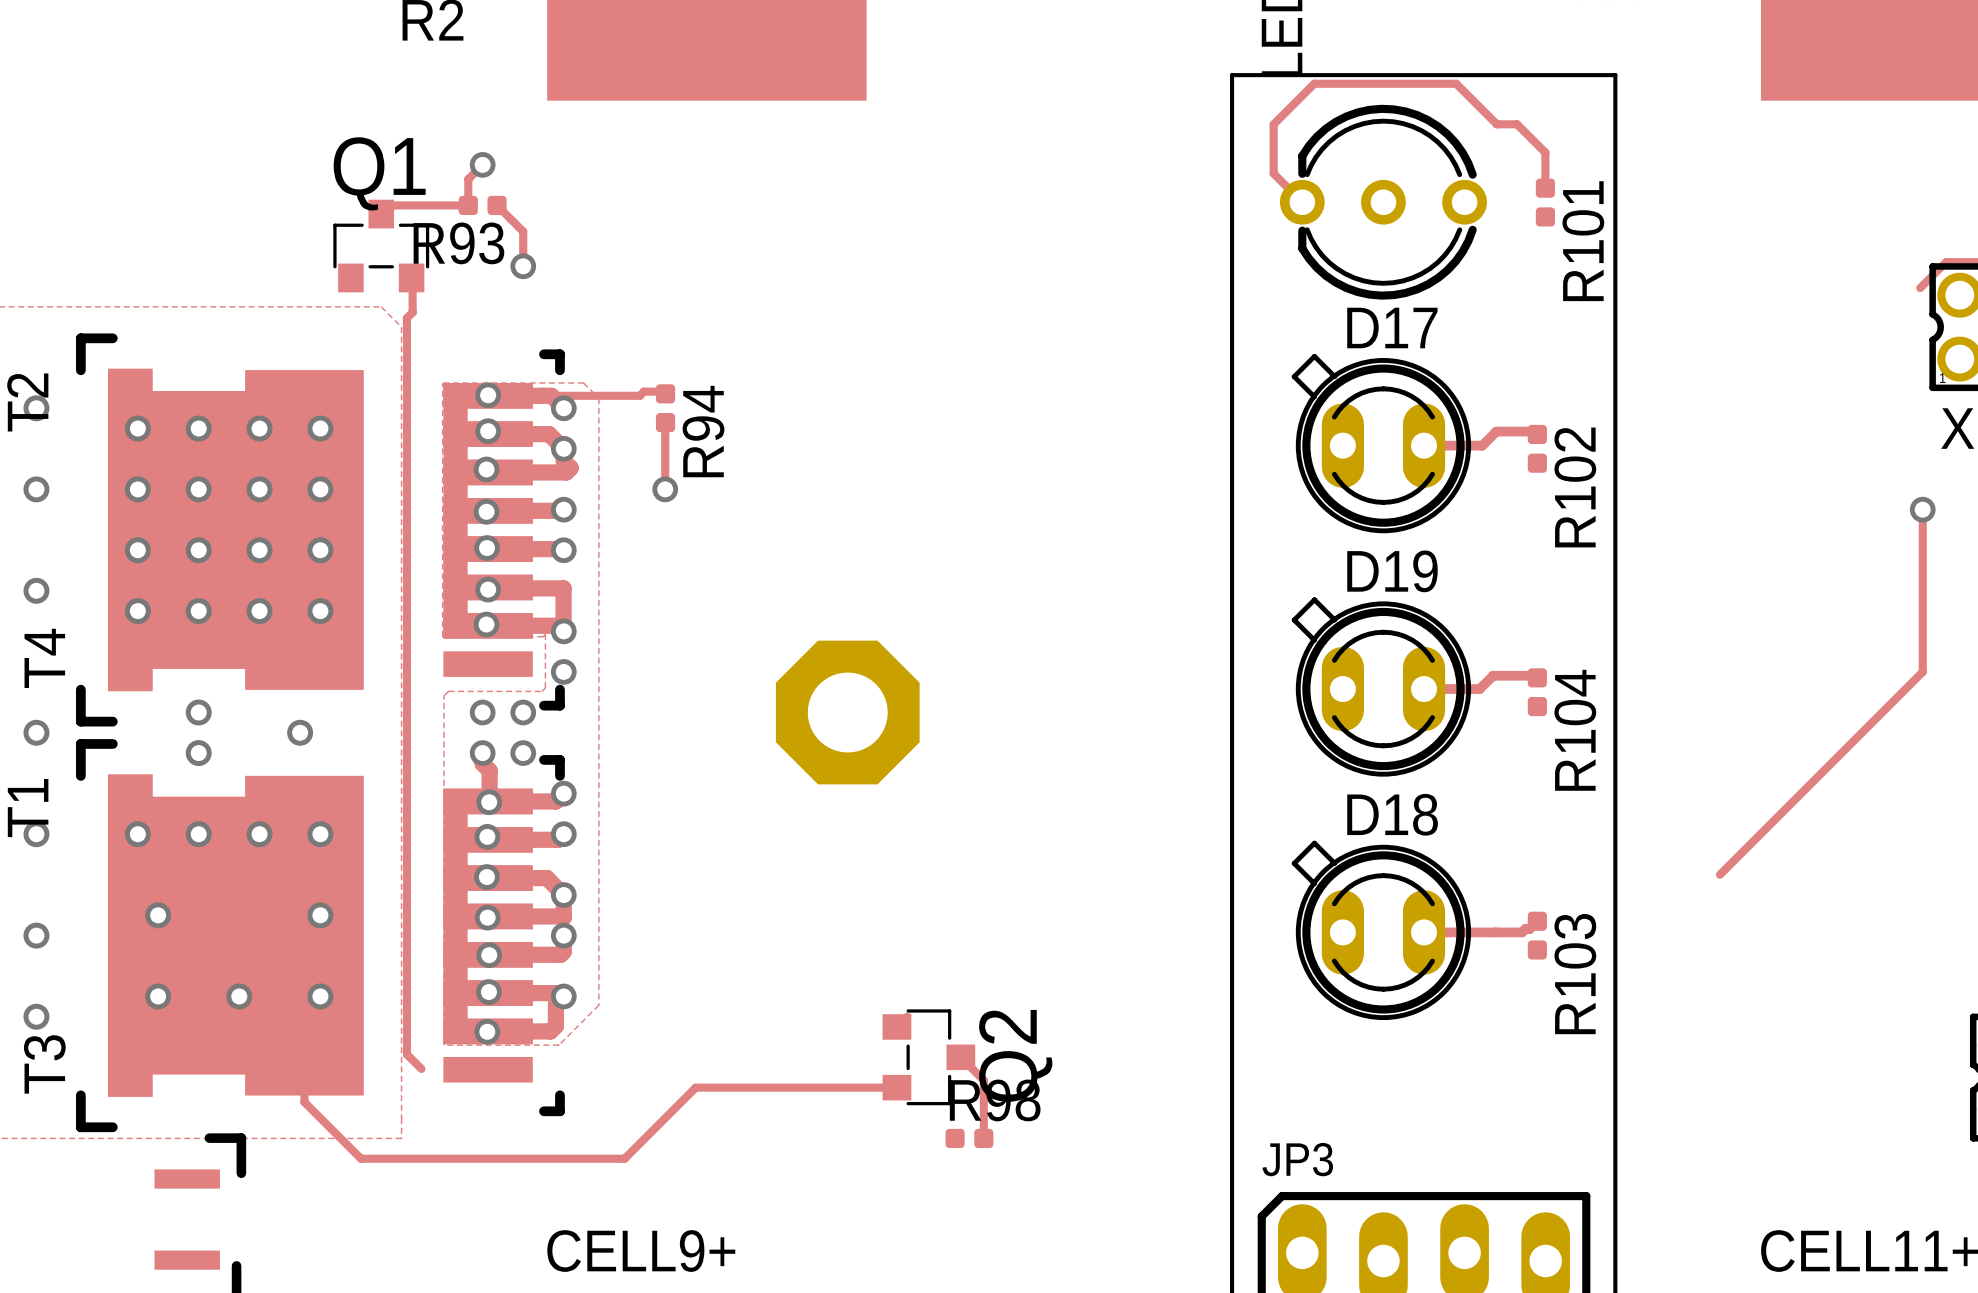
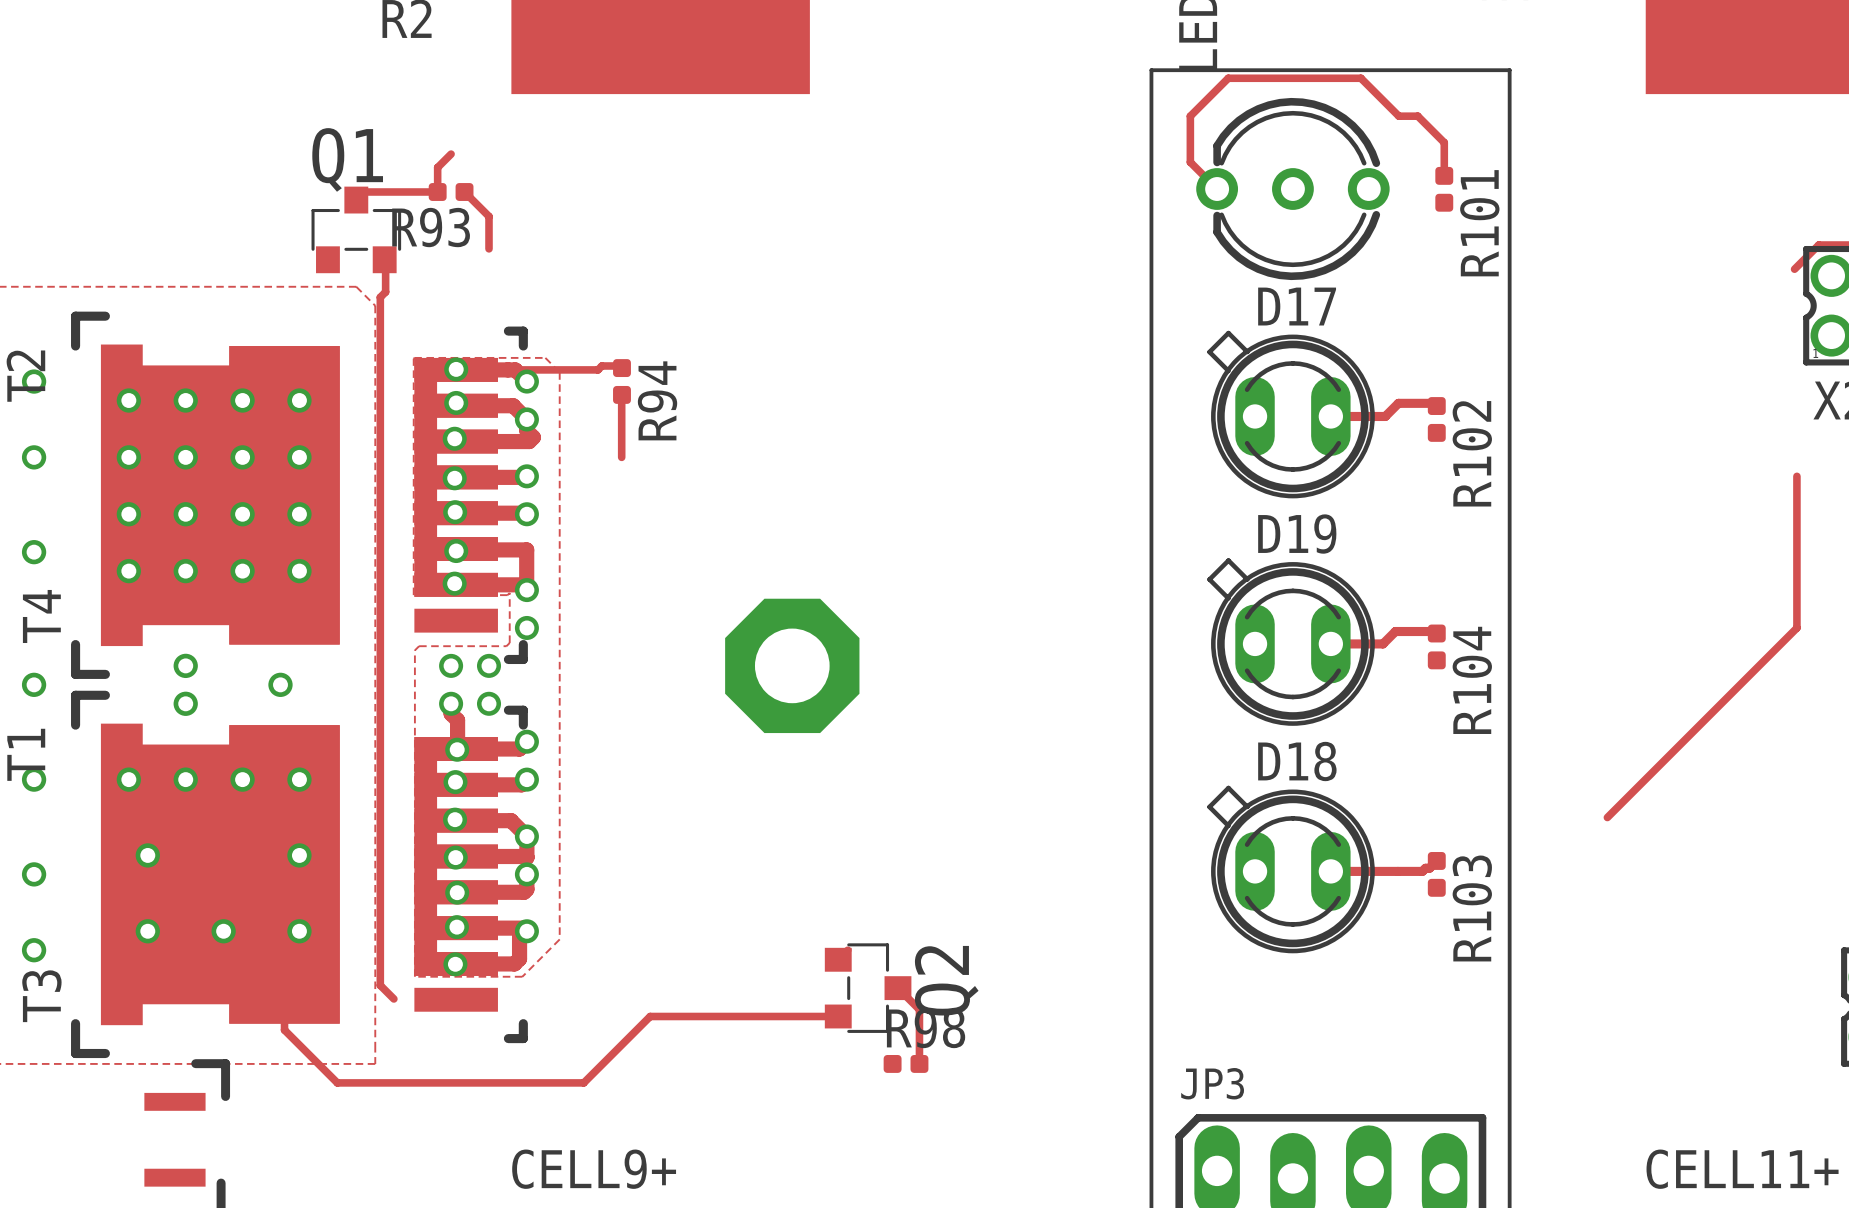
via: (482, 164) -> none
via: (523, 266) -> none
via: (665, 489) -> none
via: (1922, 509) -> none

